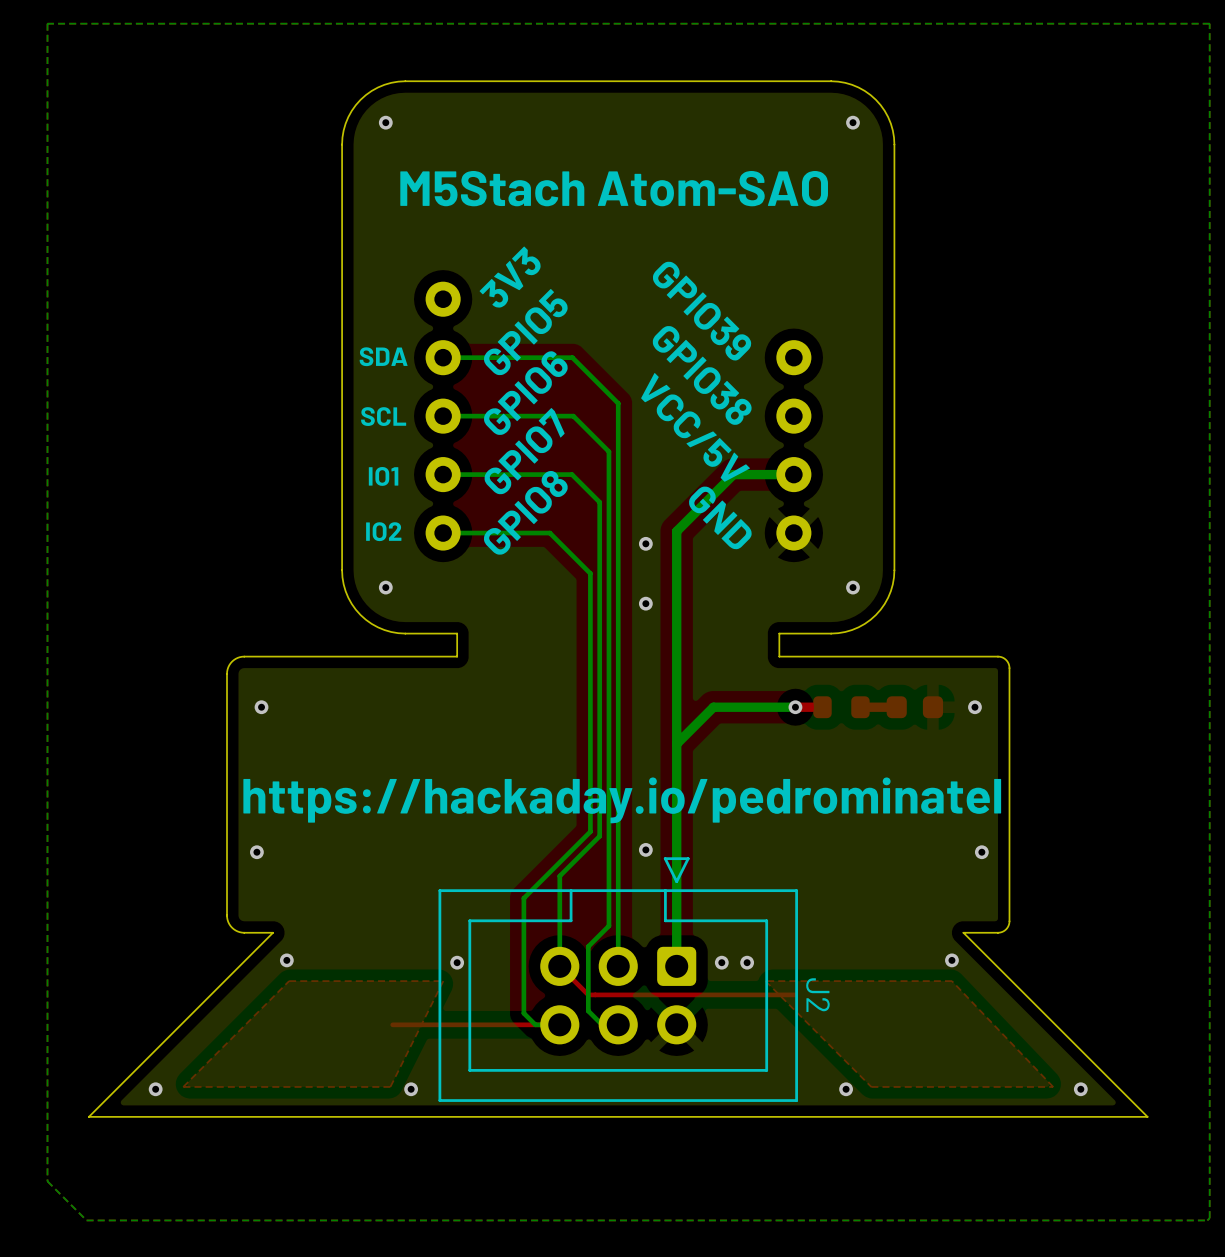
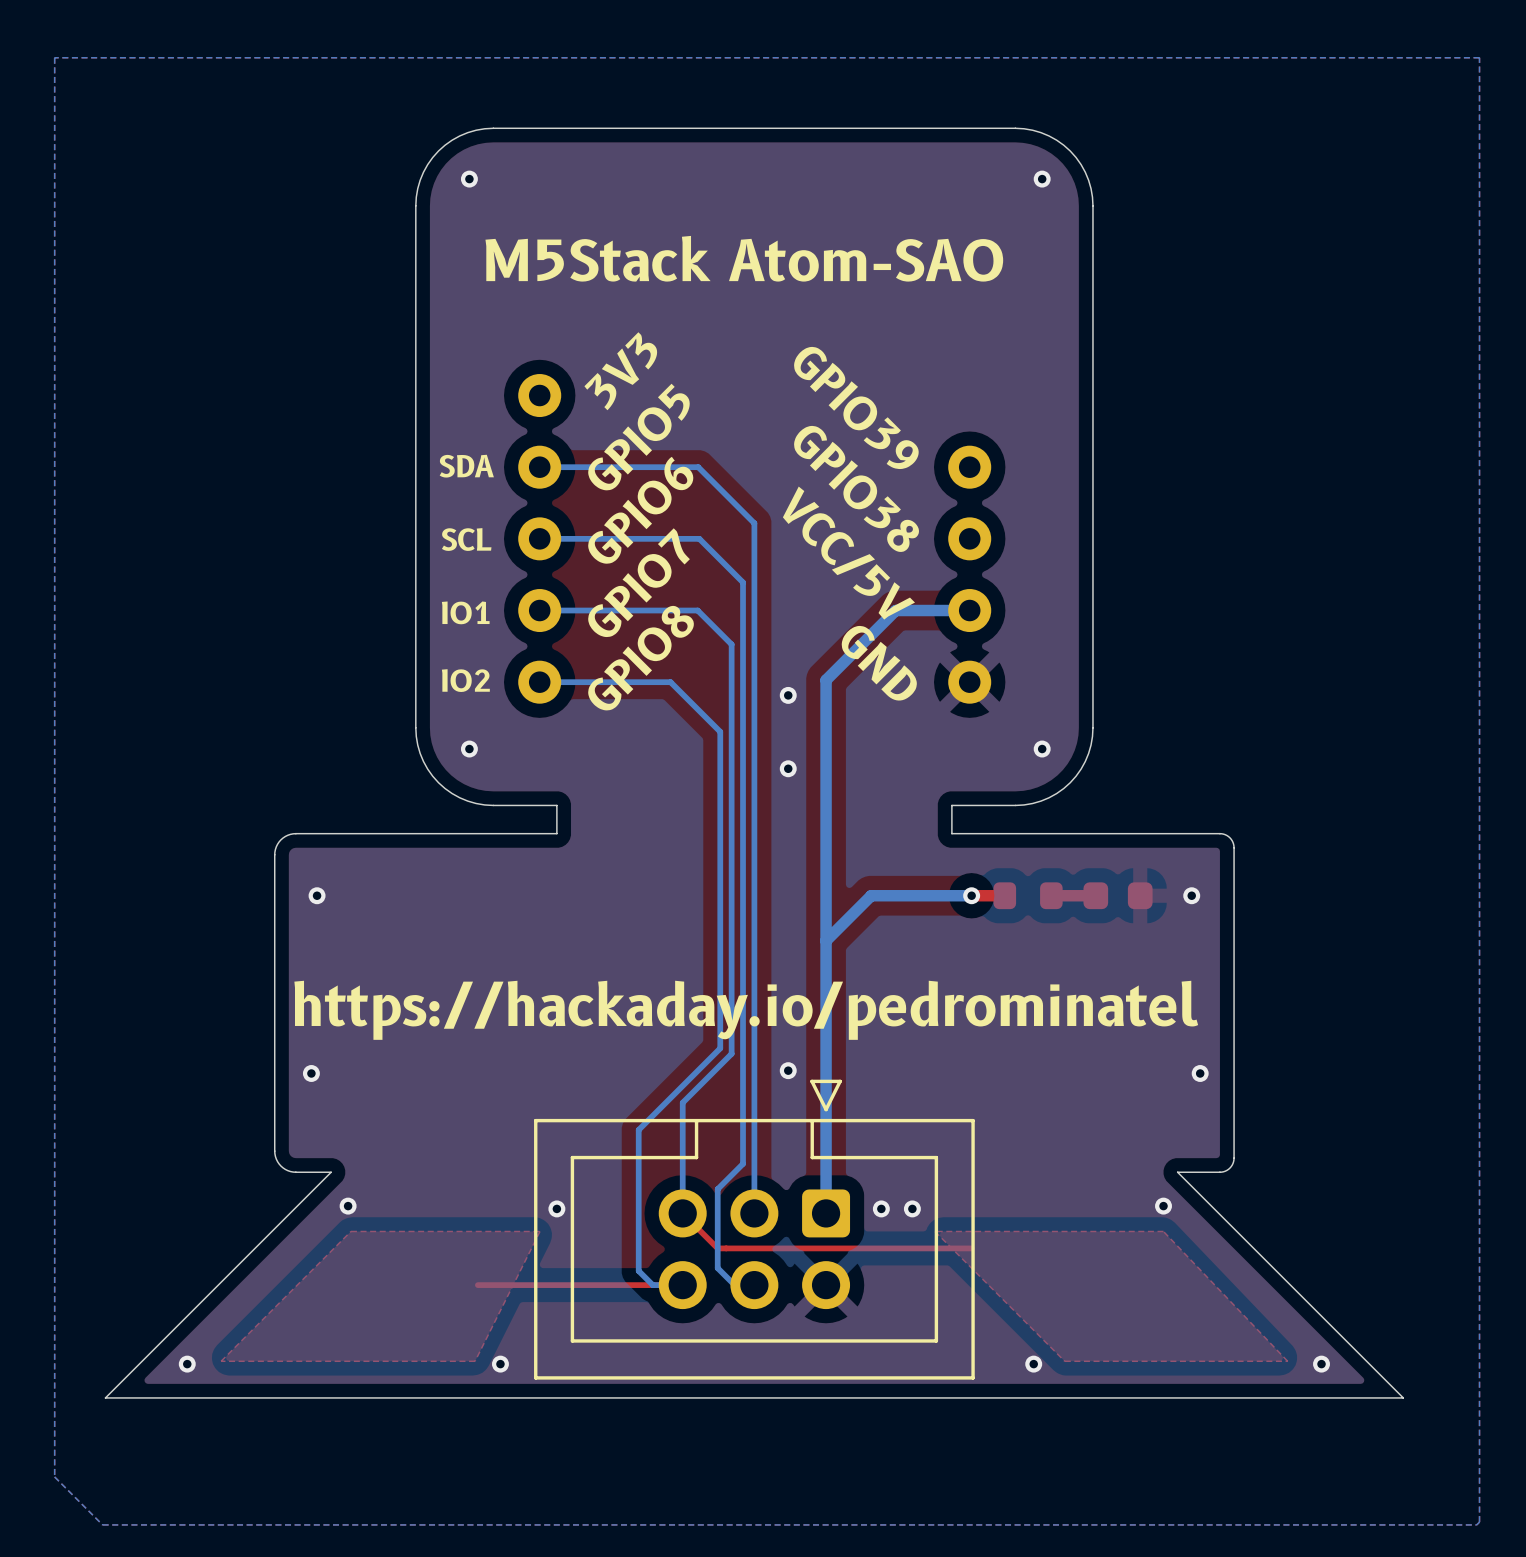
text: M5Stach Atom-SAO (614, 188) -> M5Stack Atom-SAO (744, 258)
J2 name: J2 (817, 995) -> none

